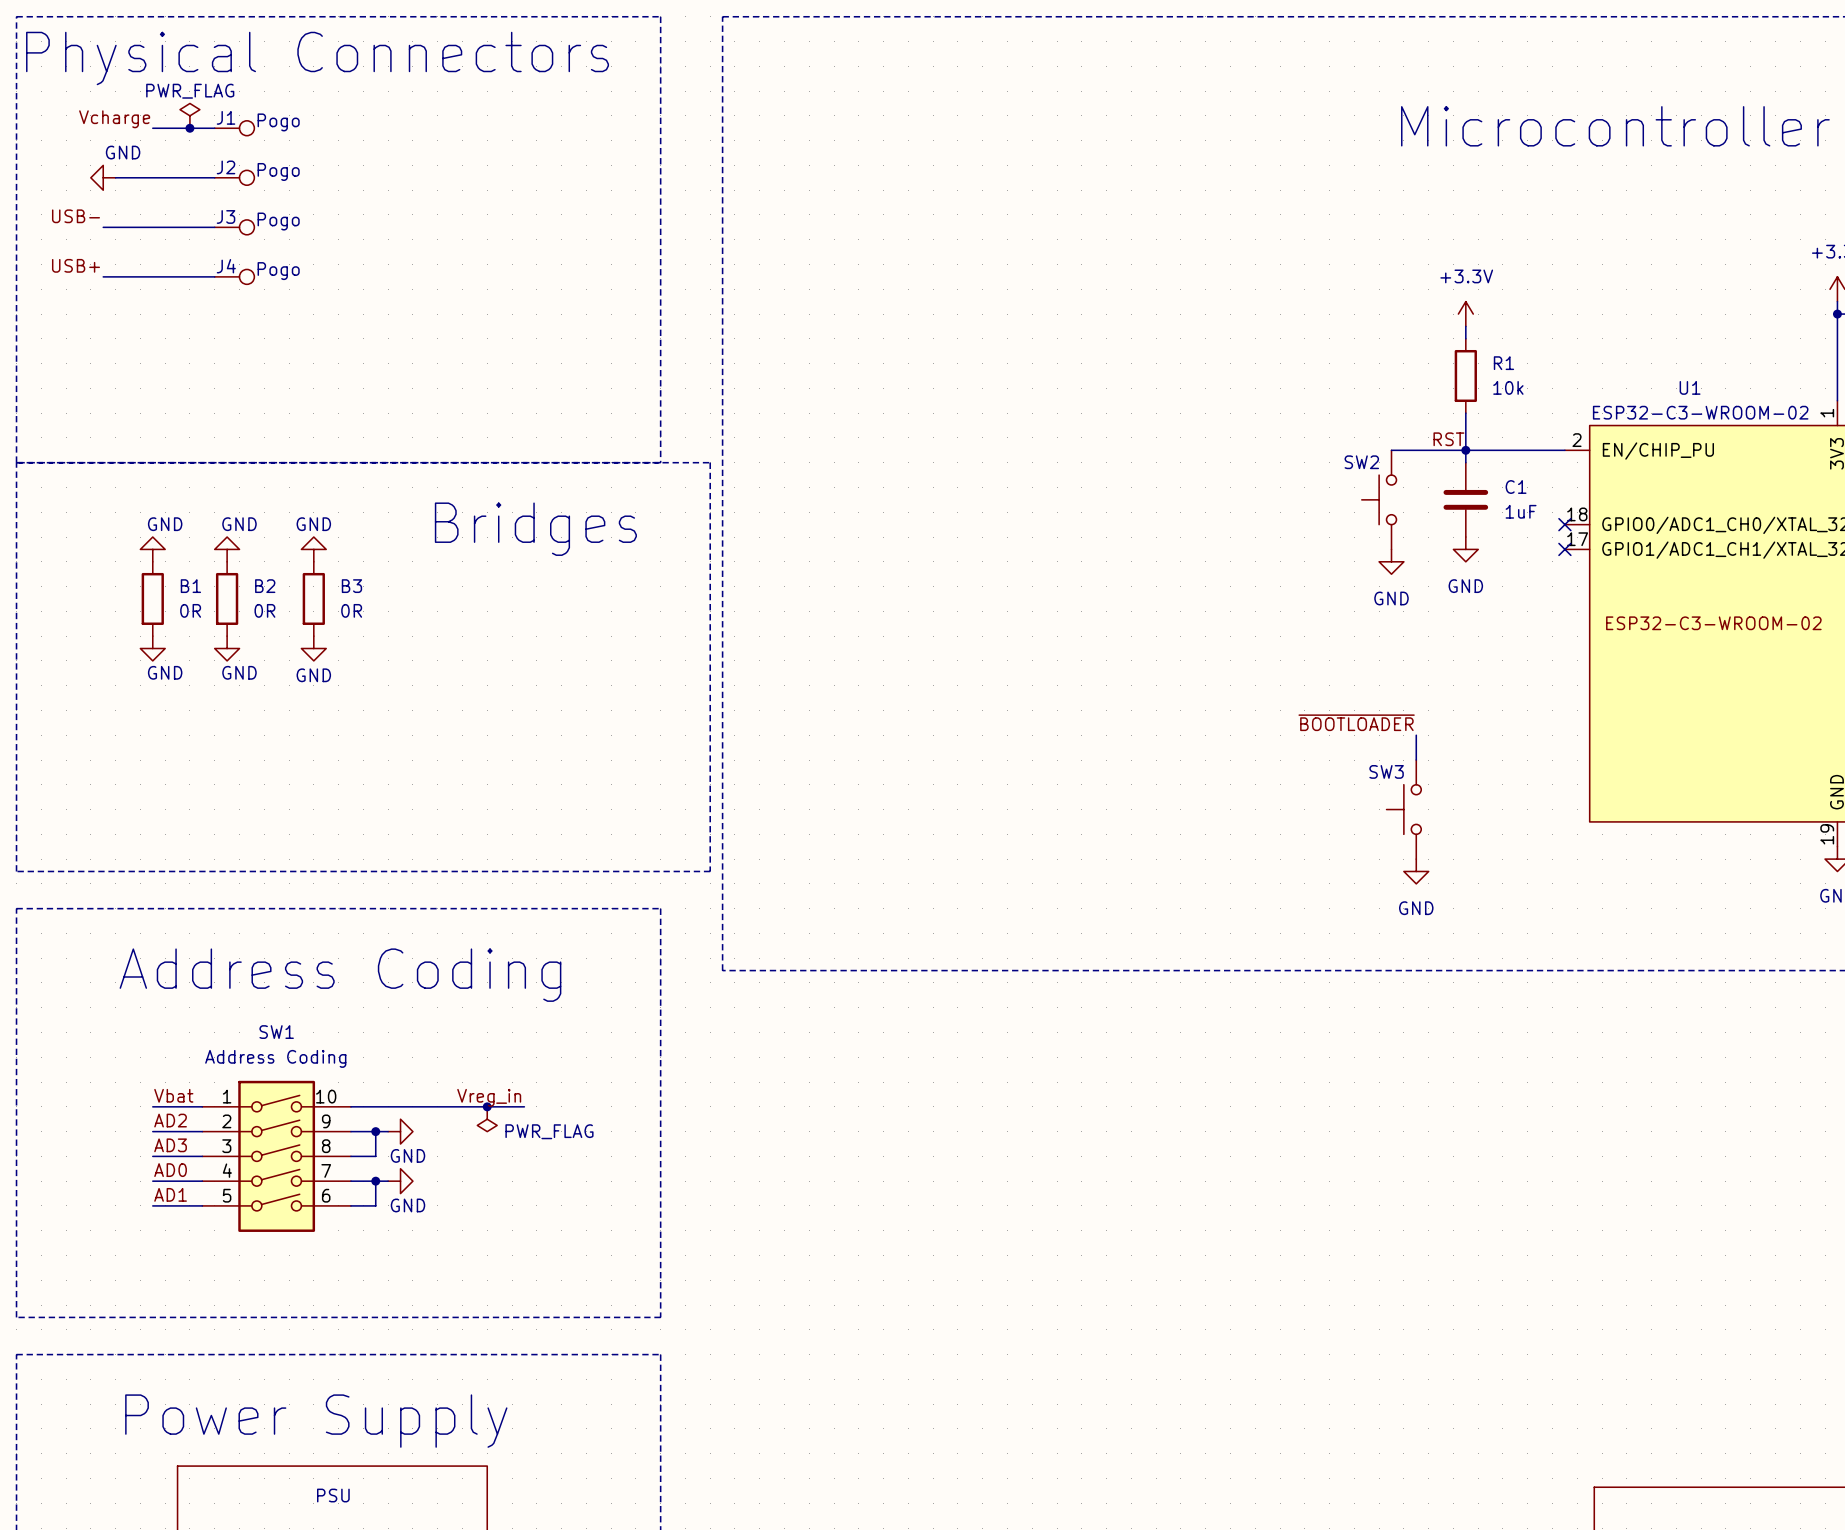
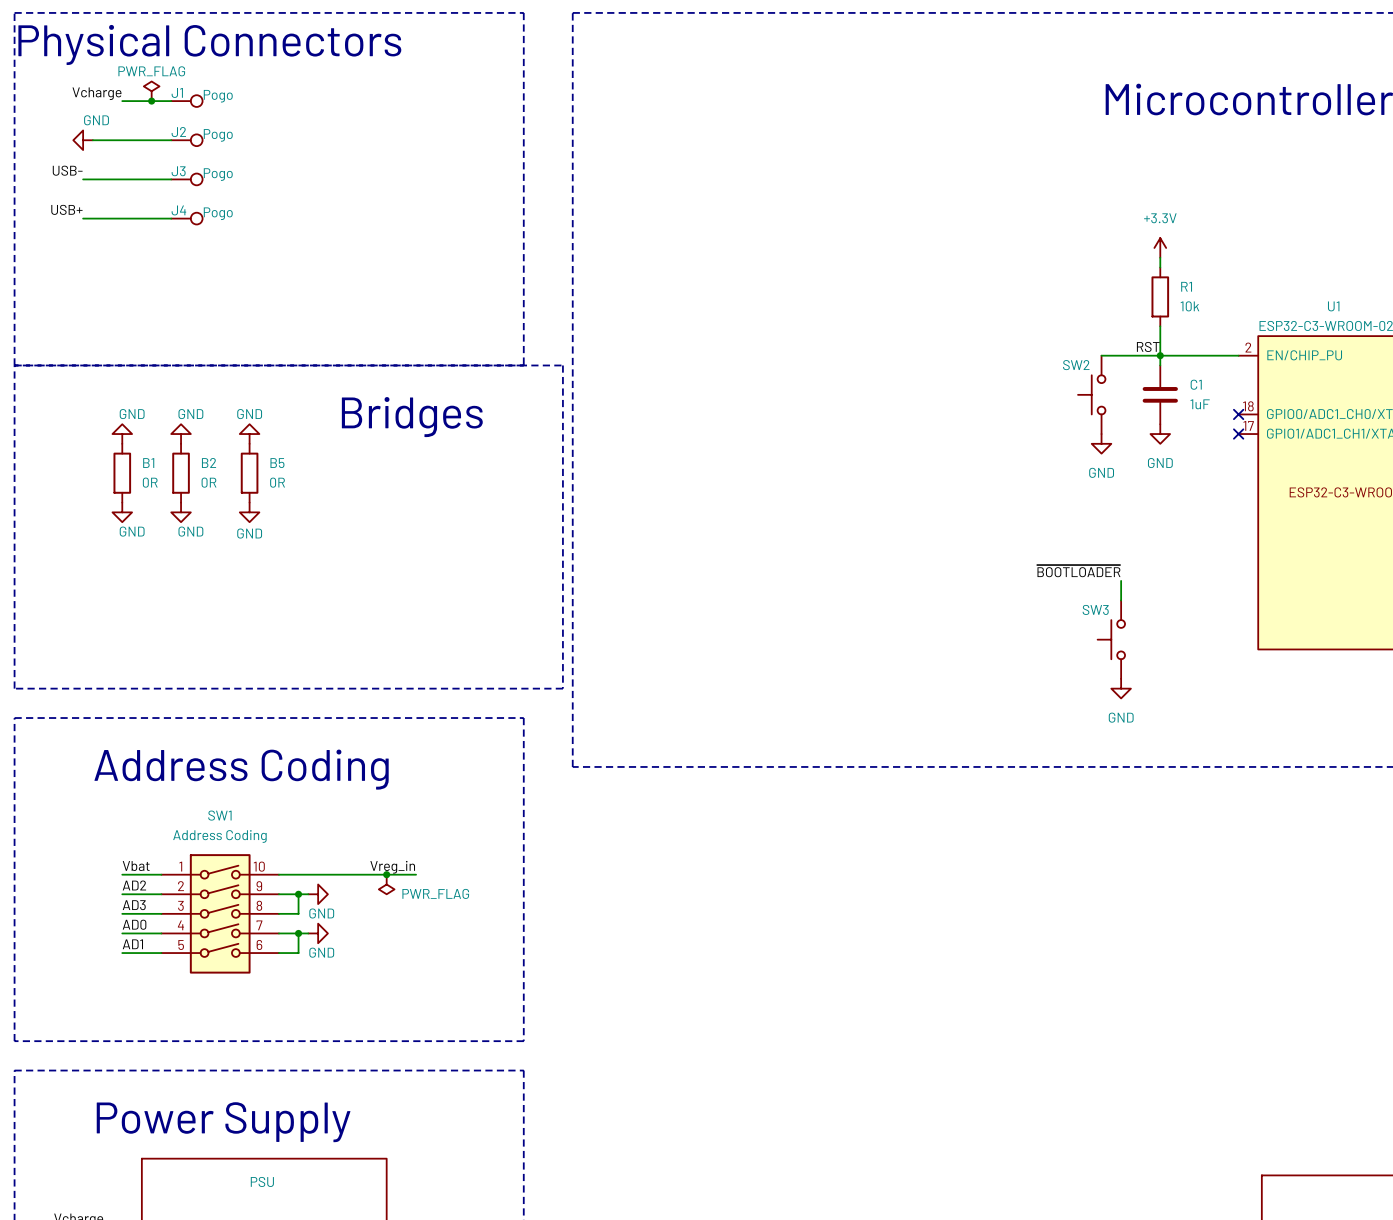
B3 name: B3 (351, 586) -> B5 (277, 463)

